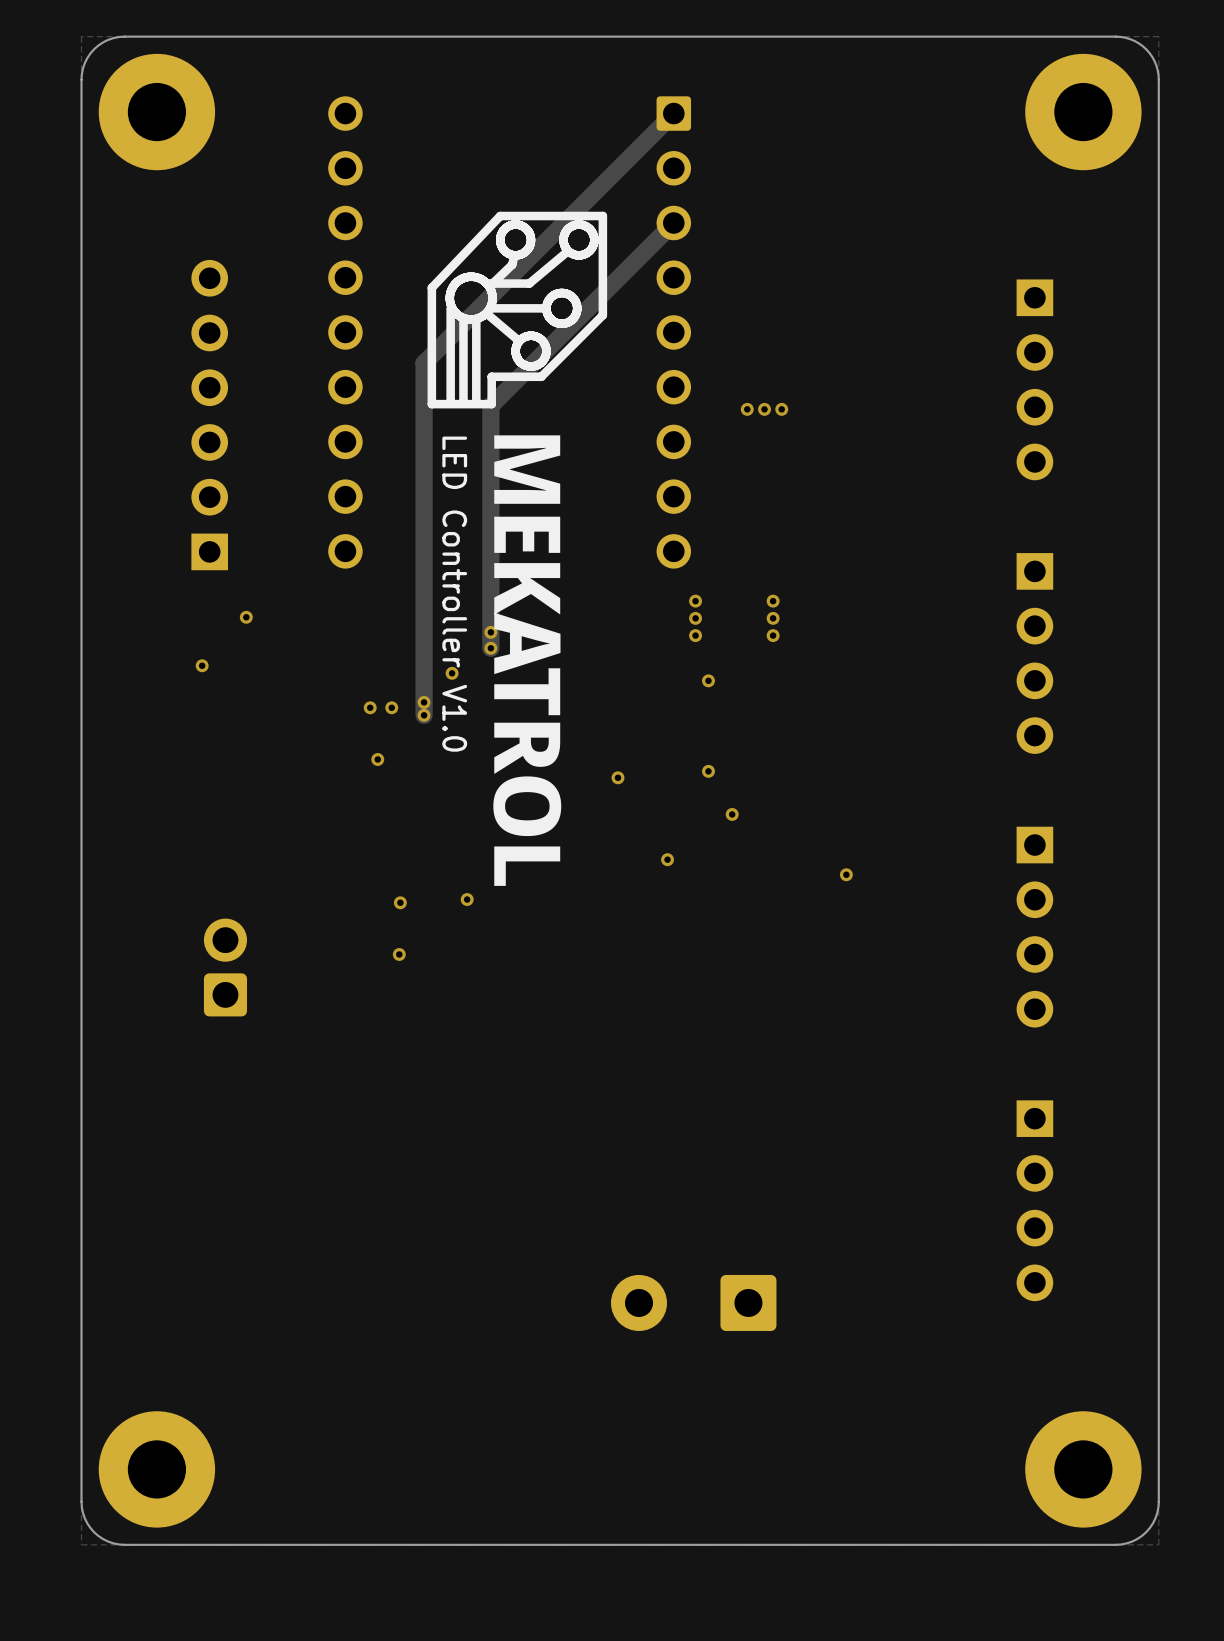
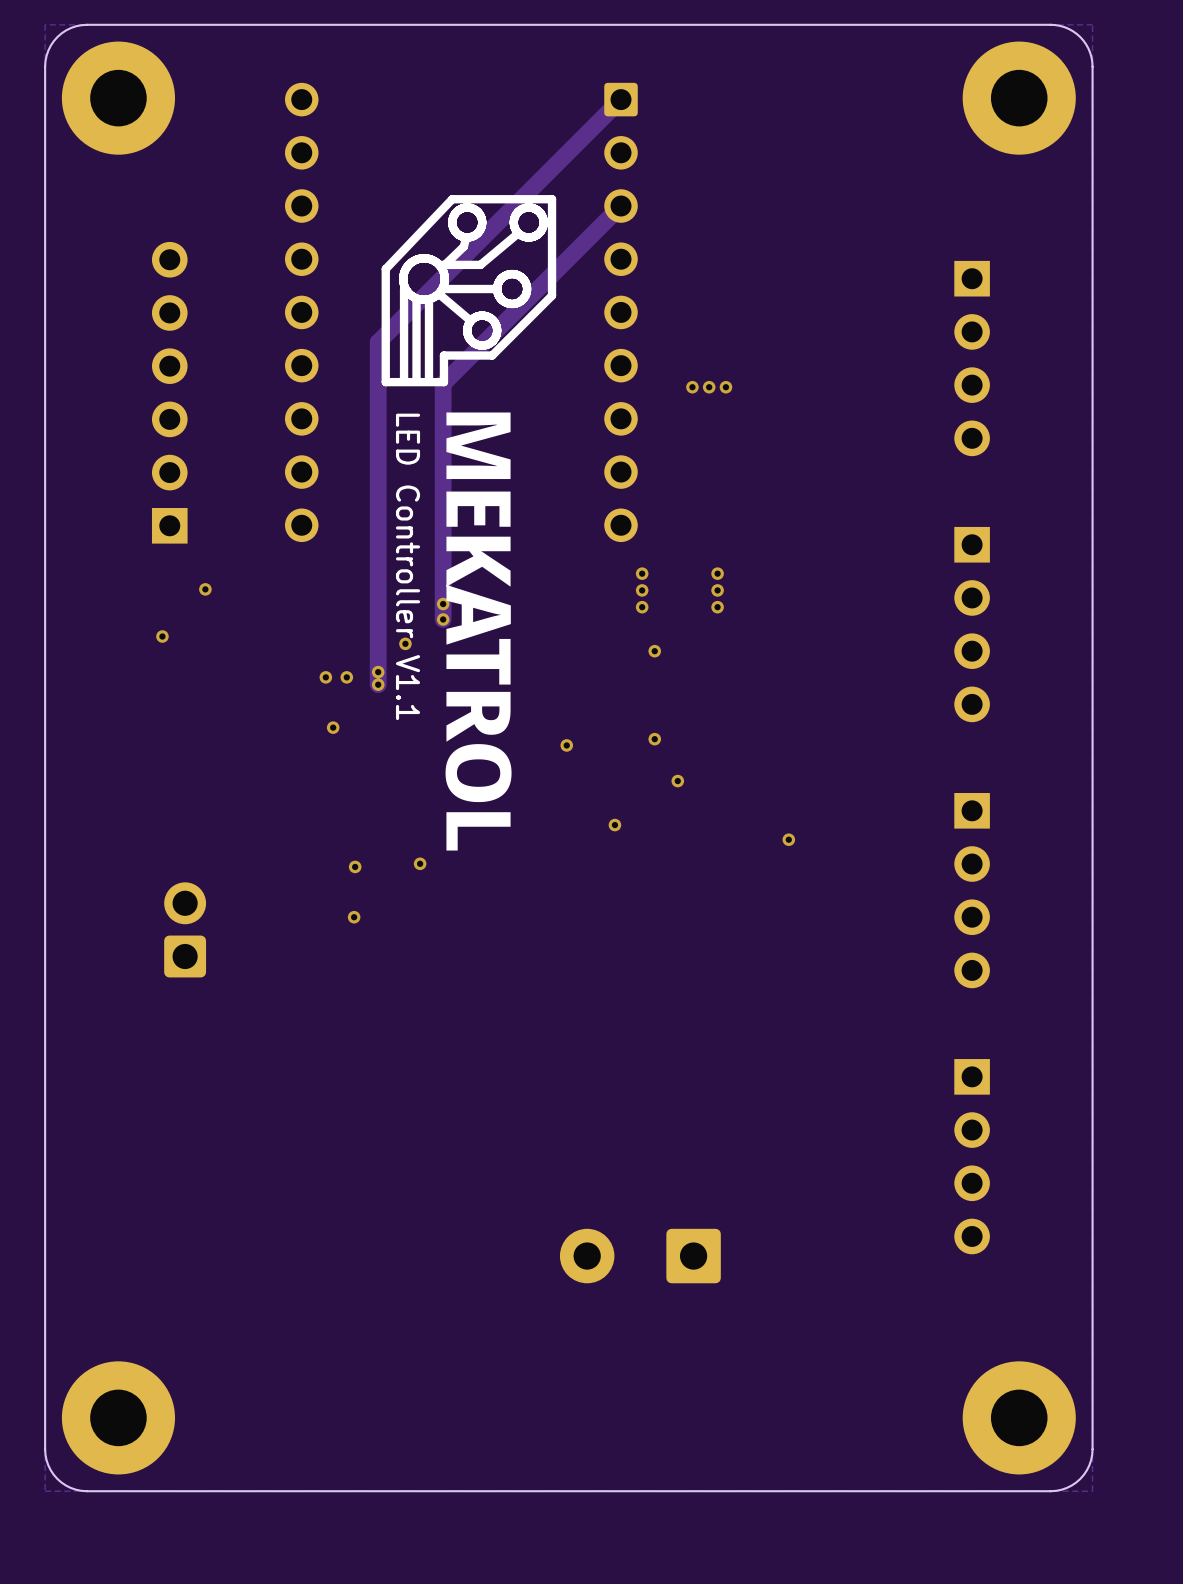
text: LED Controller V1.0 (454, 594) -> LED Controller V1.1 (408, 566)

